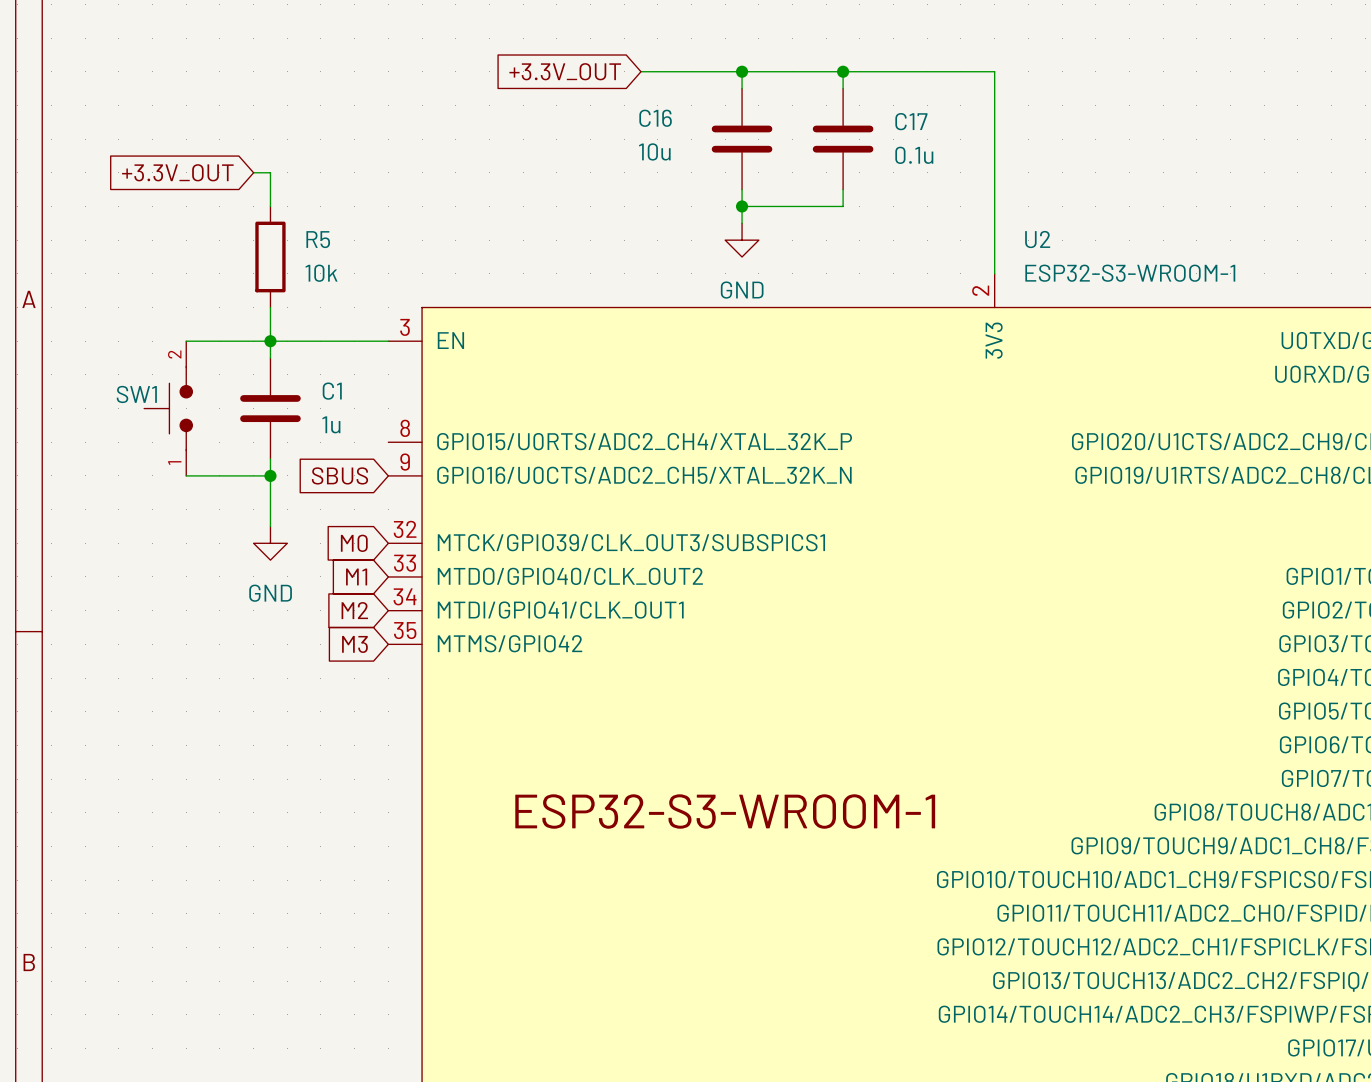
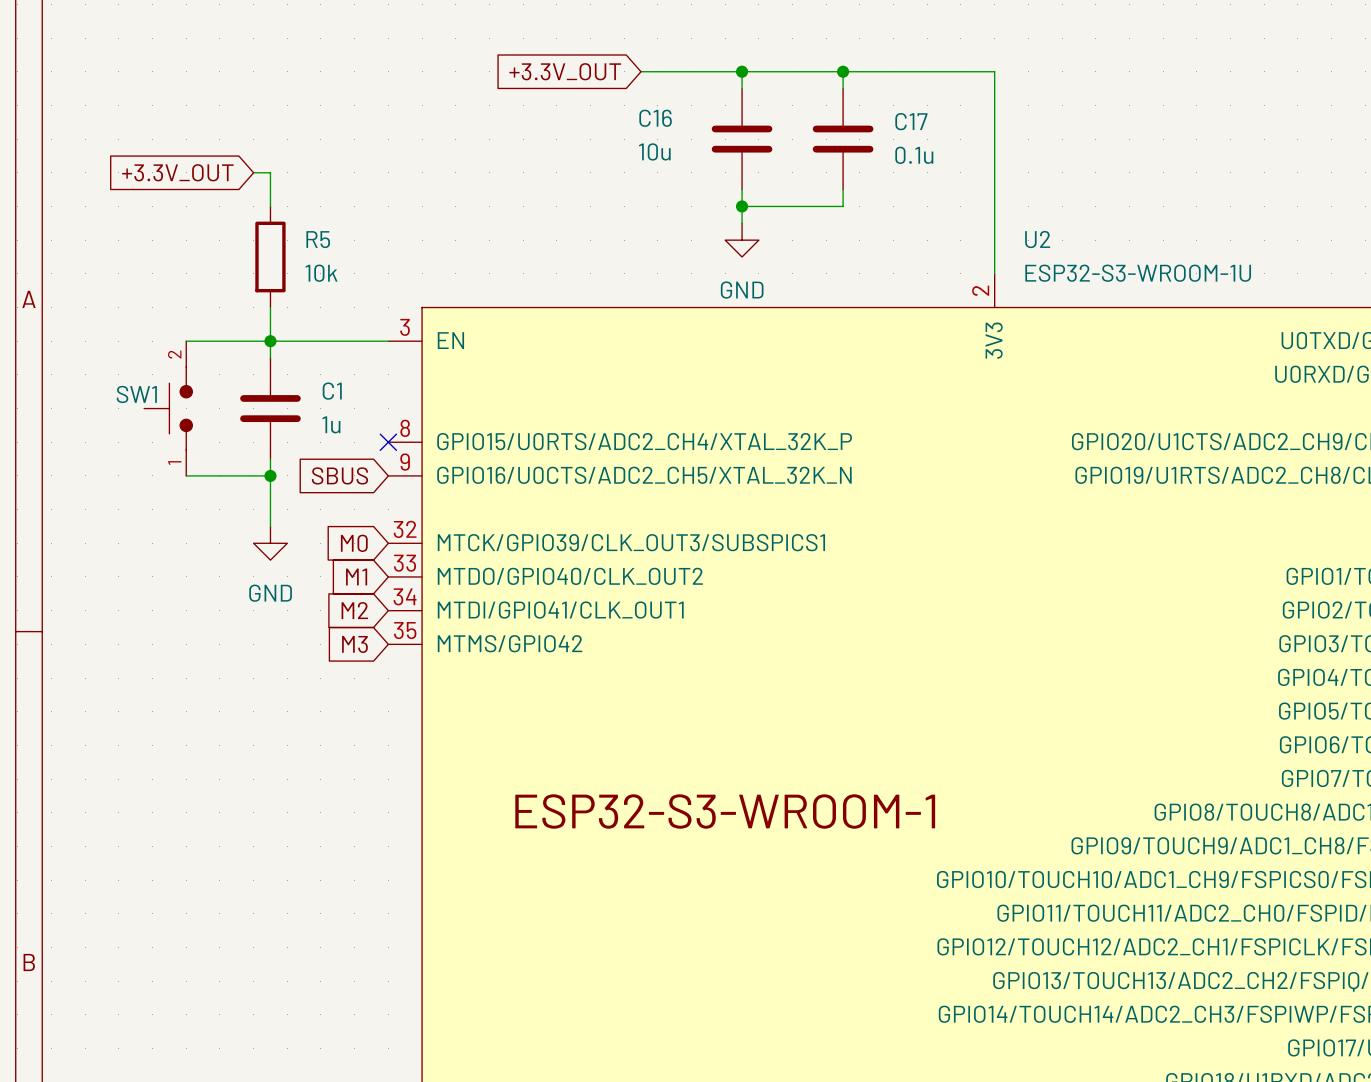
U2 value: ESP32-S3-WROOM-1 (1130, 273) -> ESP32-S3-WROOM-1U (1138, 273)
no-connect mark: none -> (388, 442)

